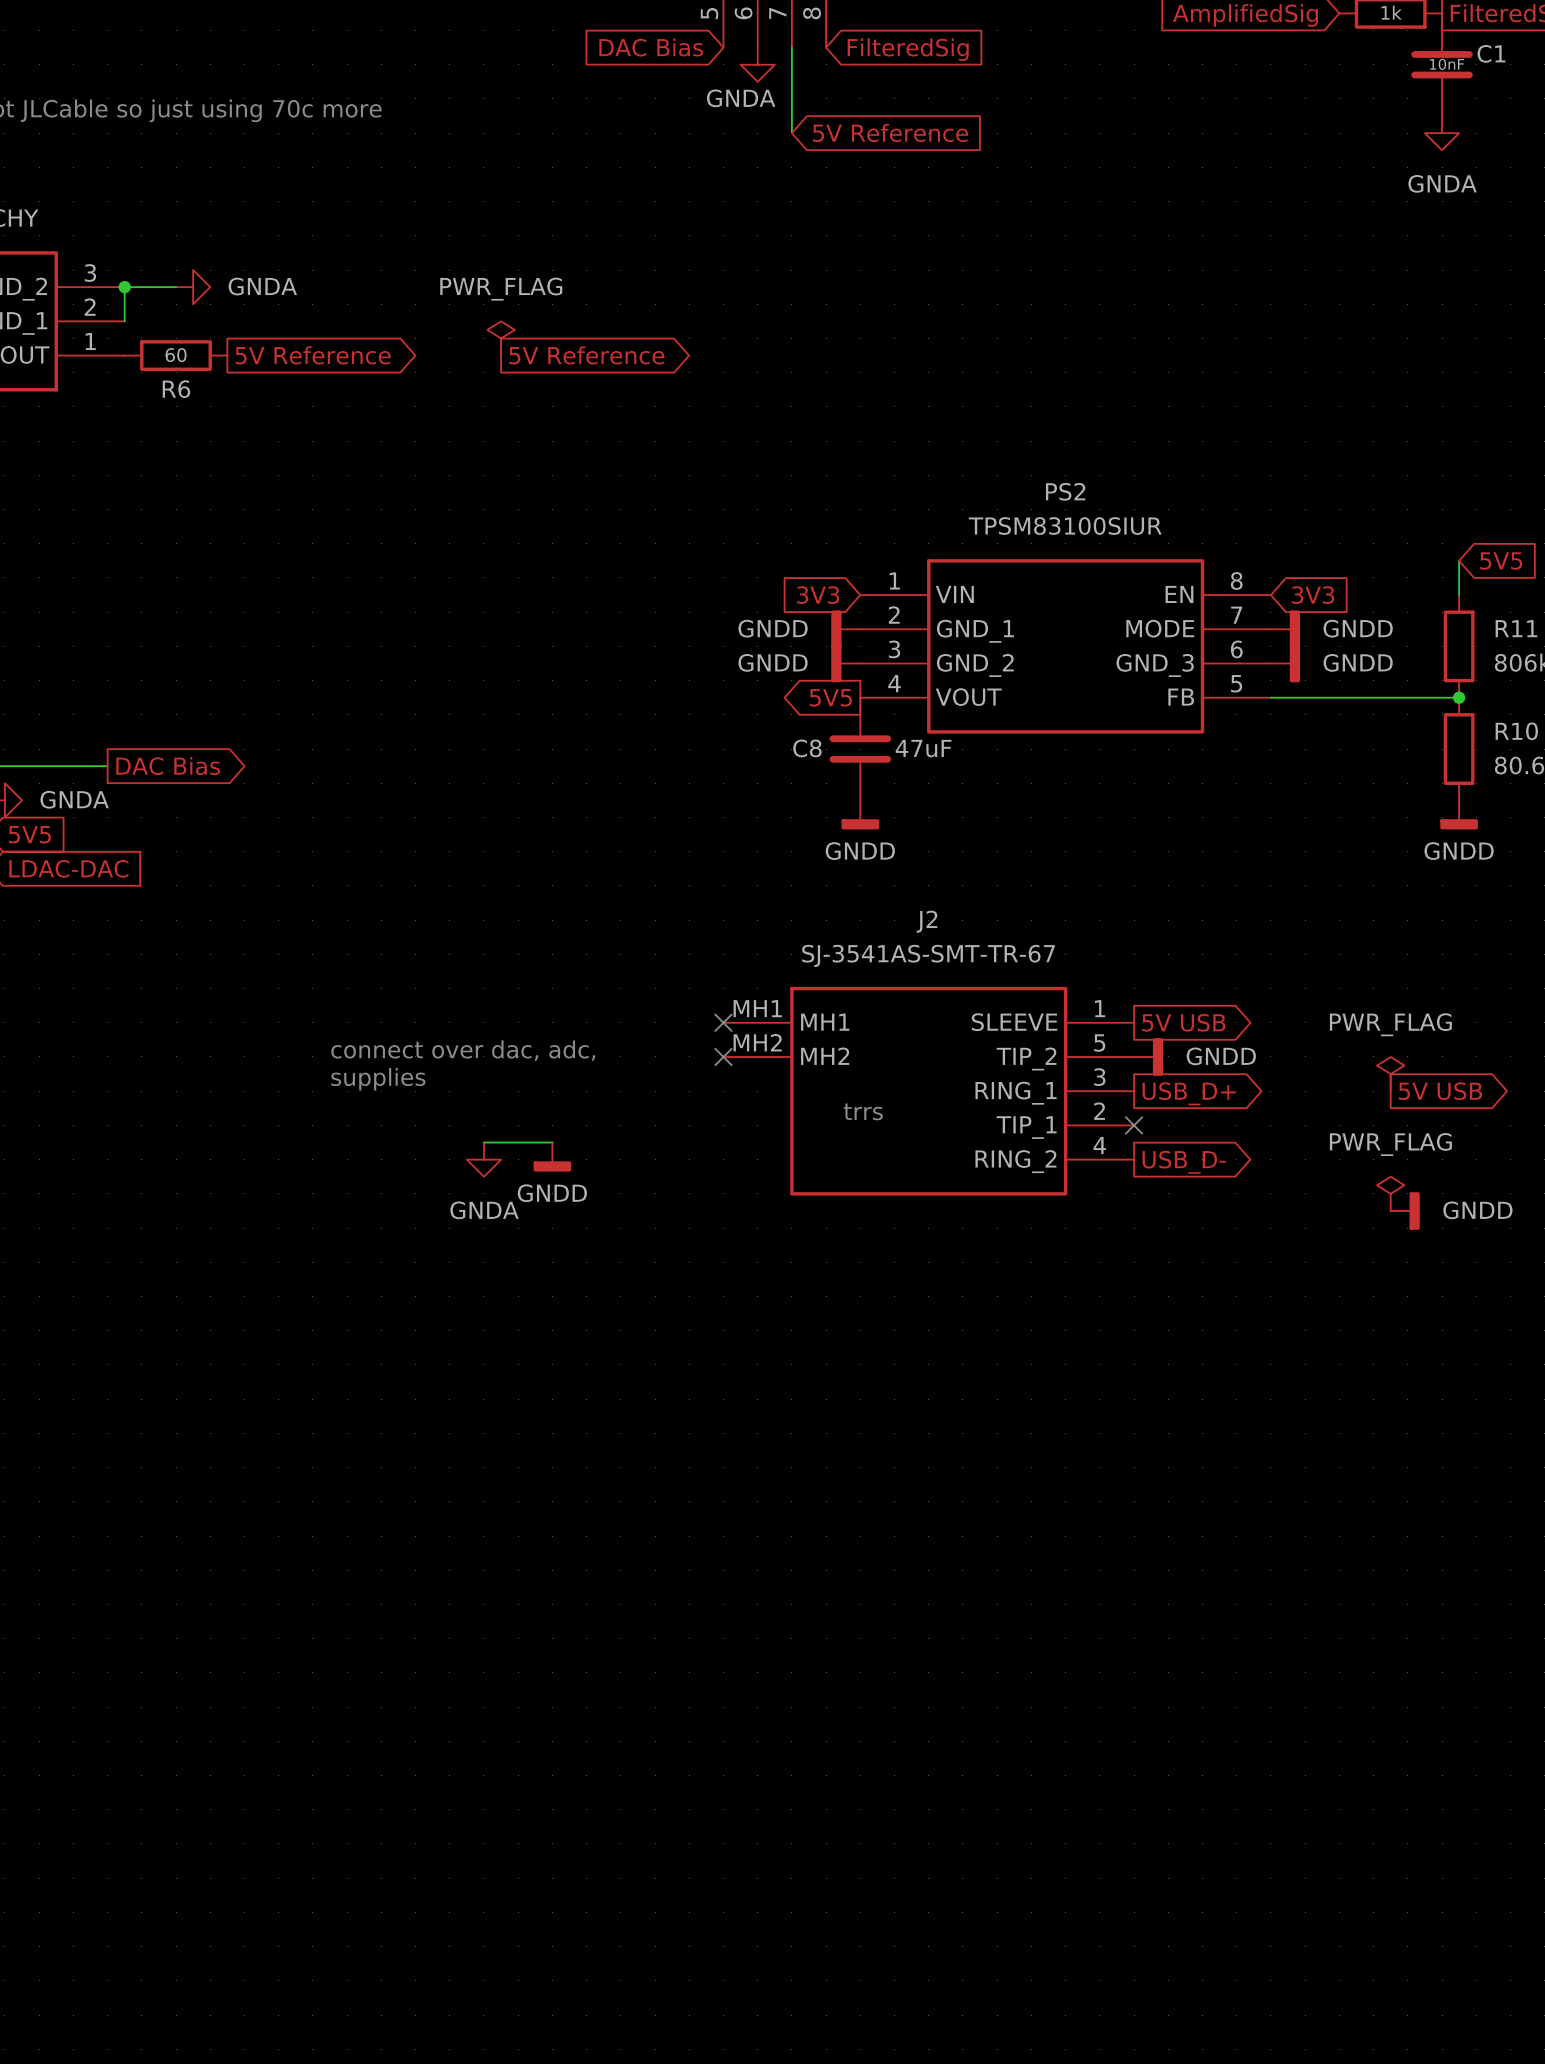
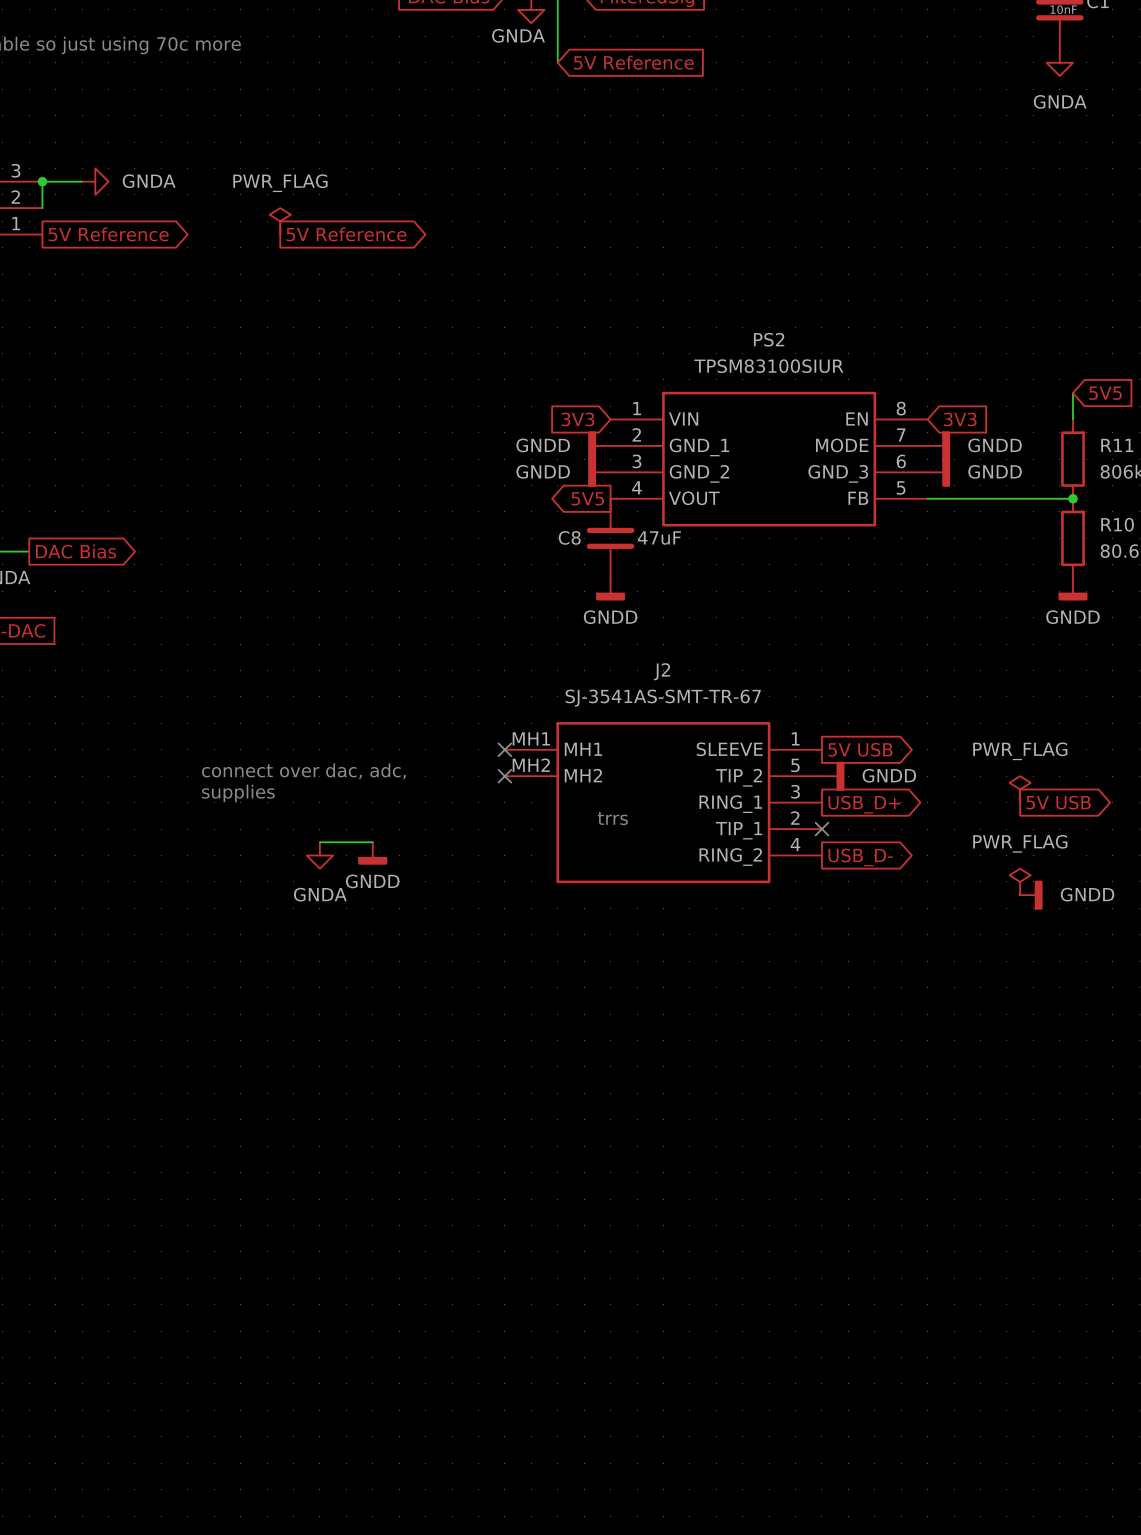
power symbol position: PWR_FLAG (501, 338) -> PWR_FLAG (280, 221)
R6: 60 (176, 355) -> none
global label position: 5V Reference (313, 355) -> 5V Reference (108, 234)
global label position: 5V Reference (586, 355) -> 5V Reference (346, 234)

